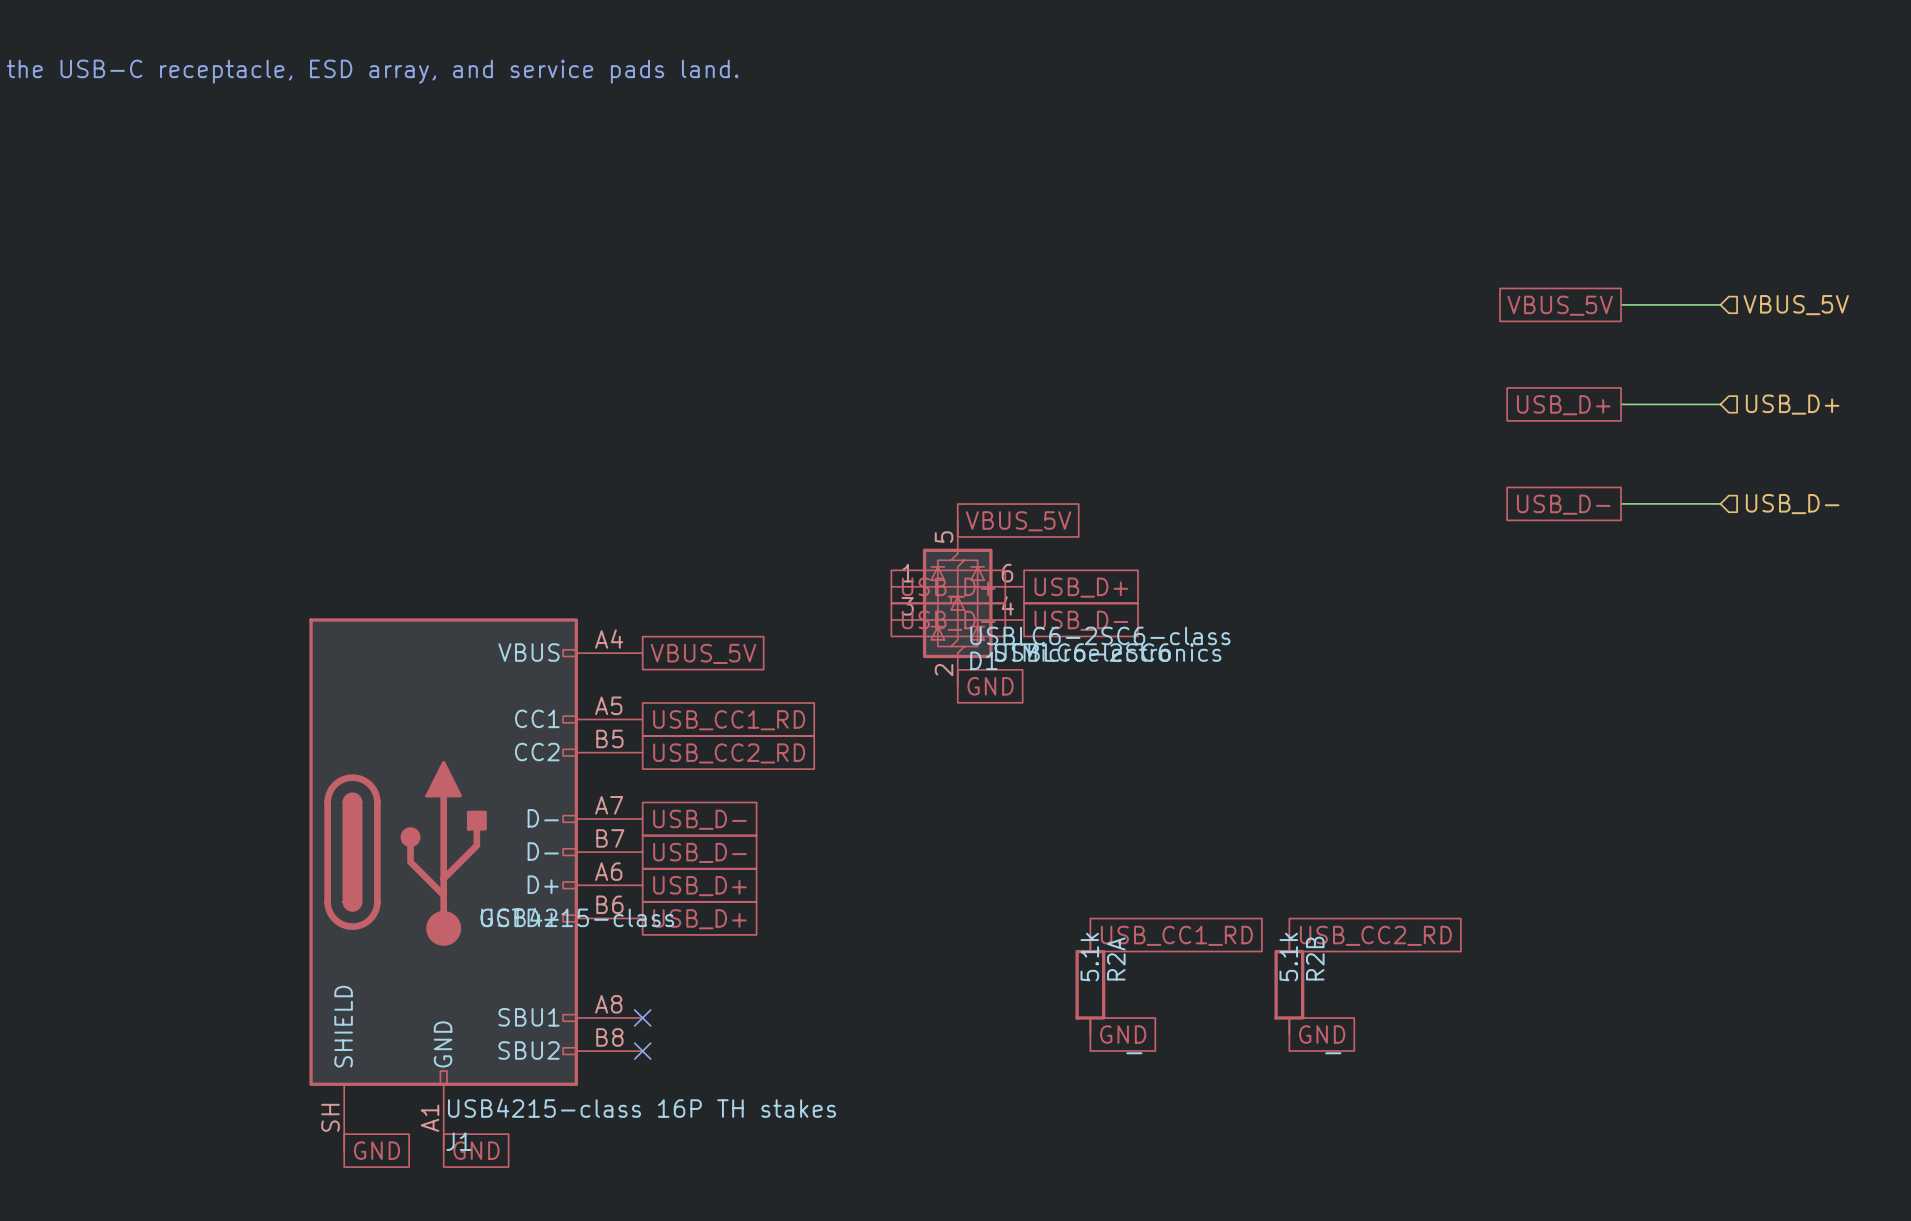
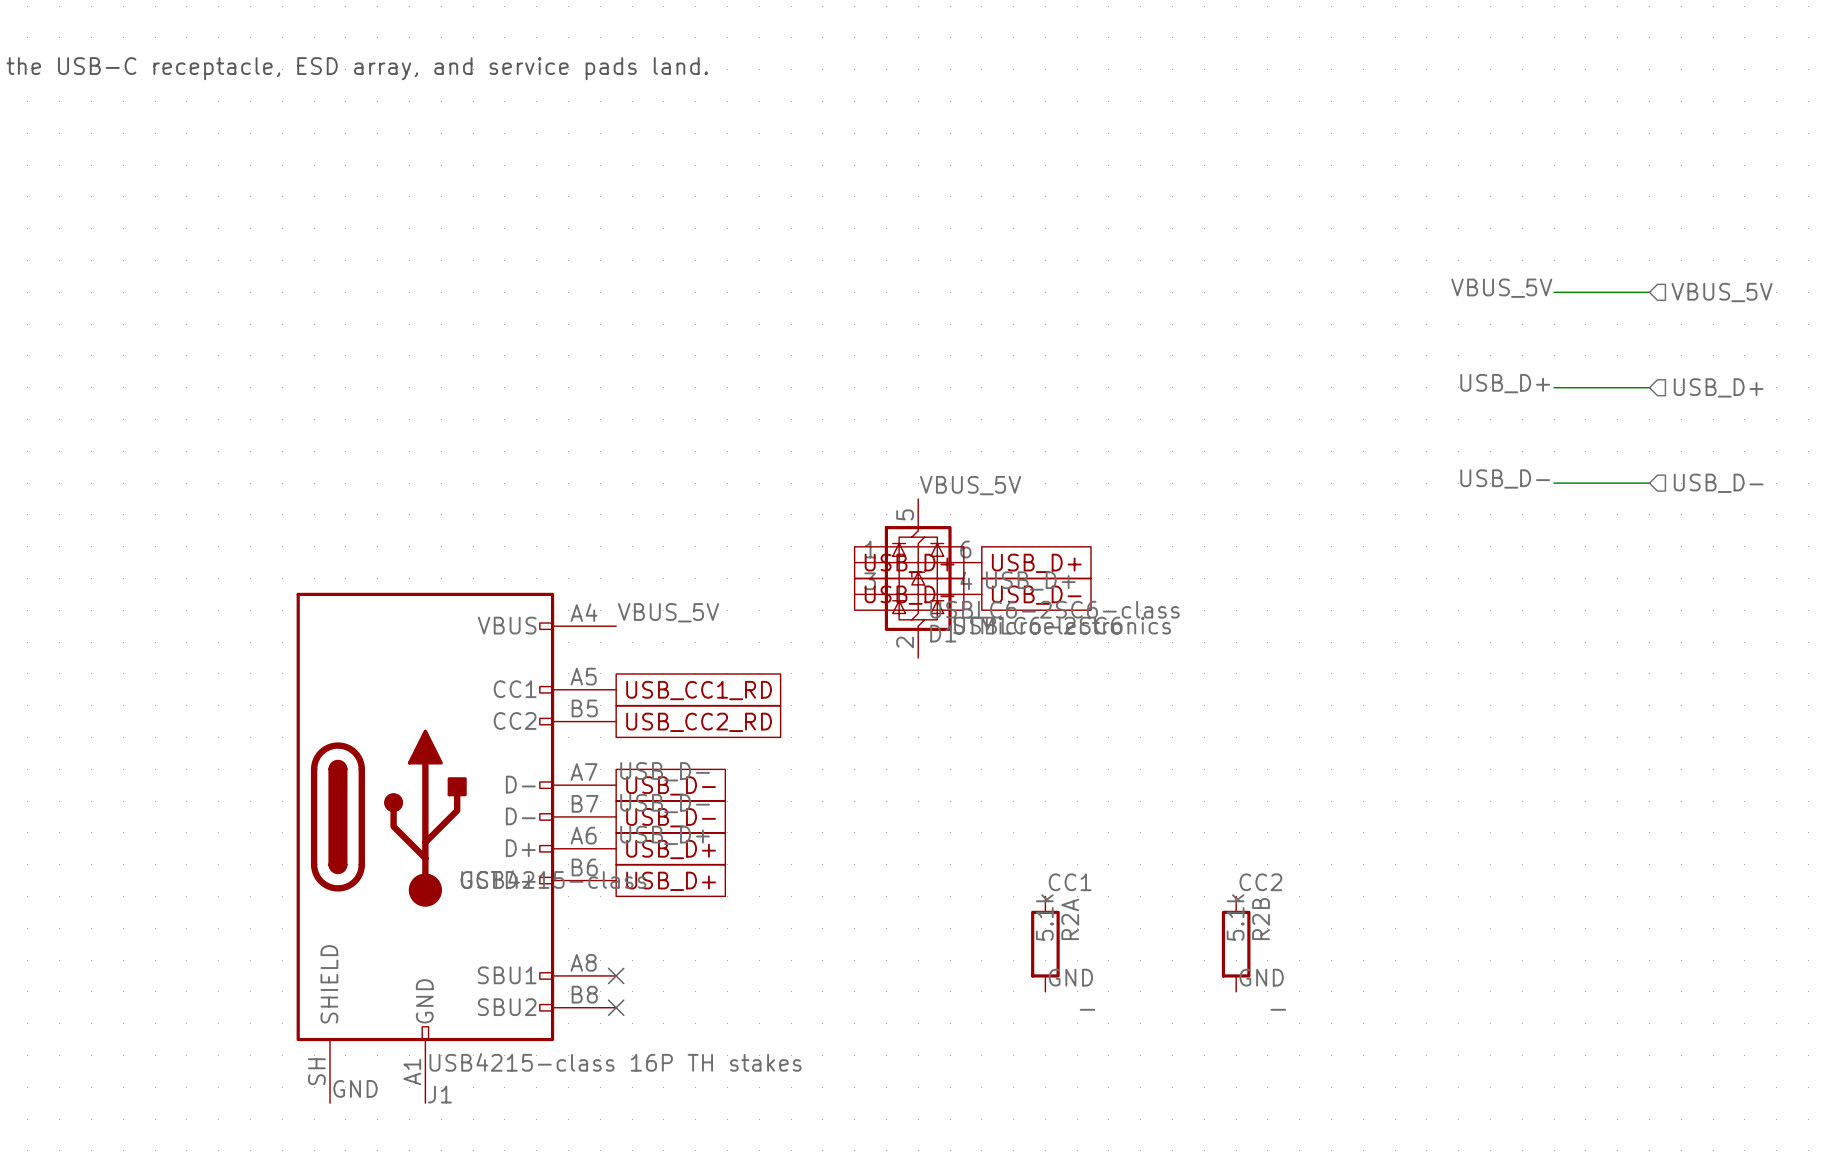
label: none -> VBUS_5V (1501, 288)
global label: VBUS_5V (1560, 305) -> none
label: none -> USB_D+ (1505, 383)
global label: USB_D+ (1563, 405) -> none
label: none -> USB_D- (1505, 478)
global label: USB_D- (1563, 504) -> none
label: none -> VBUS_5V (970, 485)
global label: VBUS_5V (1018, 521) -> none
label: none -> USB_D+ (1030, 580)
label: none -> VBUS_5V (668, 612)
global label: VBUS_5V (703, 653) -> none
global label: GND (990, 686) -> none
label: none -> USB_D- (665, 771)
label: none -> USB_D- (665, 803)
label: none -> USB_D+ (665, 835)
label: none -> CC1 (1070, 882)
label: none -> CC2 (1260, 882)
global label: USB_CC1_RD (1176, 935) -> none
global label: USB_CC2_RD (1375, 935) -> none
label: none -> GND (1070, 977)
label: none -> GND (1261, 977)
global label: GND (1123, 1034) -> none
global label: GND (1322, 1034) -> none
label: none -> GND (355, 1088)
global label: GND (377, 1150) -> none
global label: GND (476, 1150) -> none

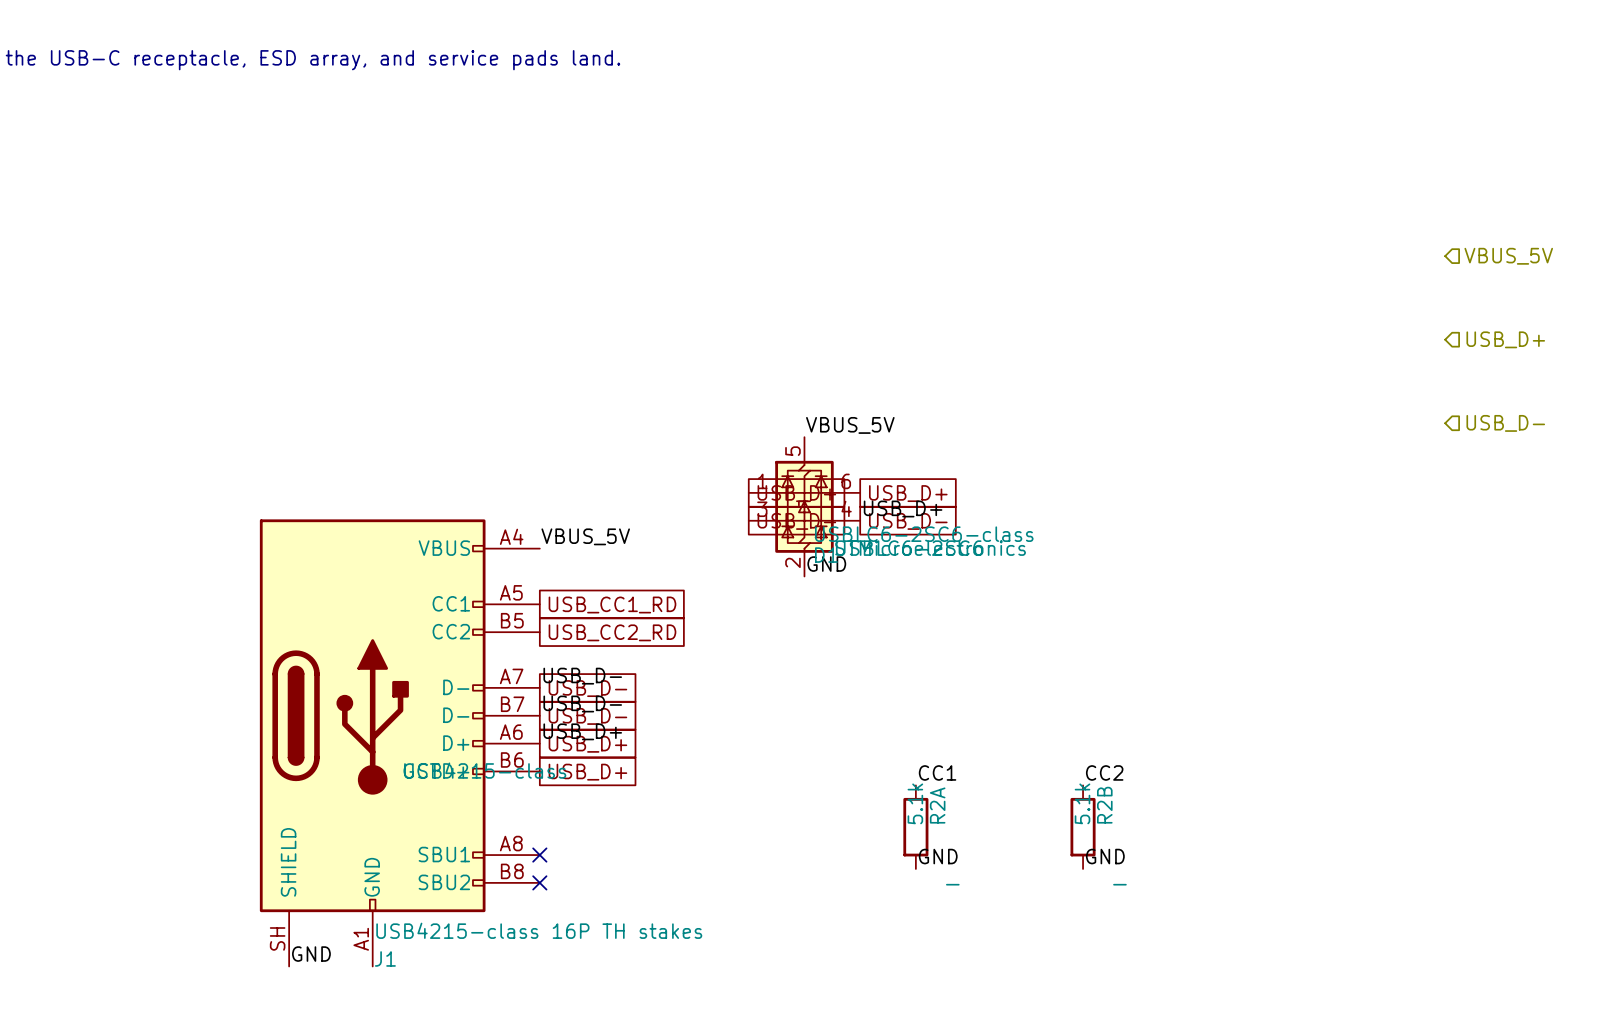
label: VBUS_5V (1501, 288) -> none
wire: (1554, 292) (1649, 292) -> none
label: USB_D+ (1505, 383) -> none
wire: (1554, 387) (1649, 387) -> none
label: USB_D- (1505, 478) -> none
wire: (1554, 483) (1649, 483) -> none
label: none -> GND (826, 564)

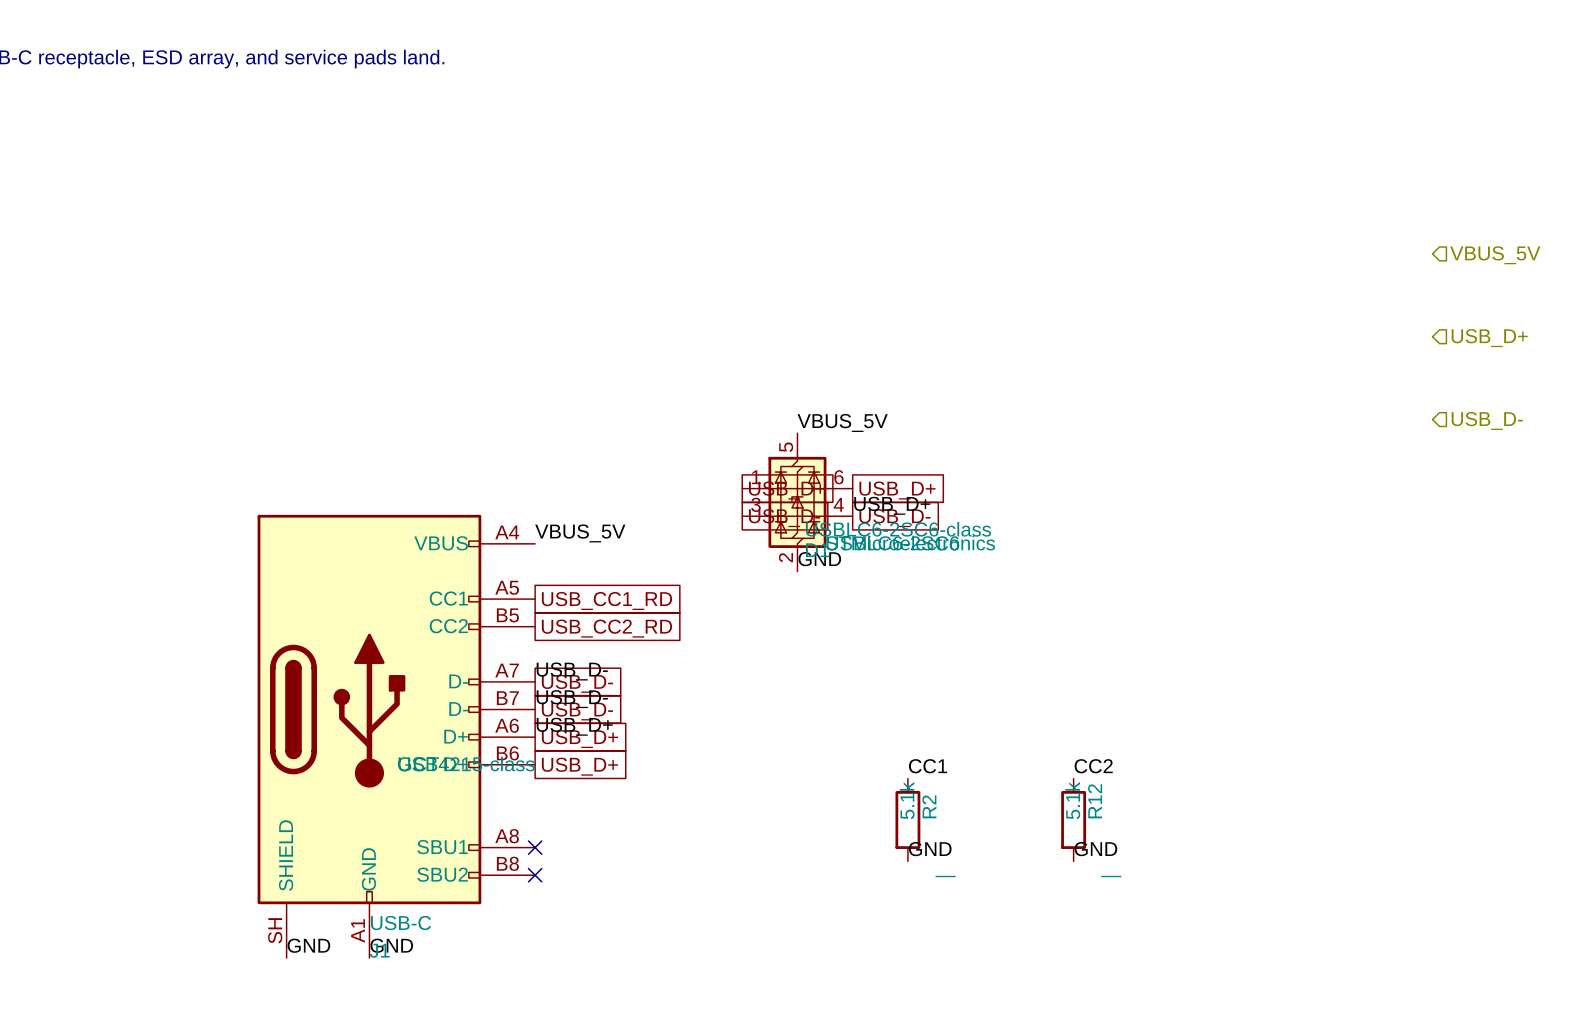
R2A name: R2A (937, 805) -> R2 (929, 806)
R2B name: R2B (1104, 805) -> R12 (1095, 801)
J1 value: USB4215-class 16P TH stakes (539, 930) -> USB-C (401, 923)
label: none -> GND (391, 945)

